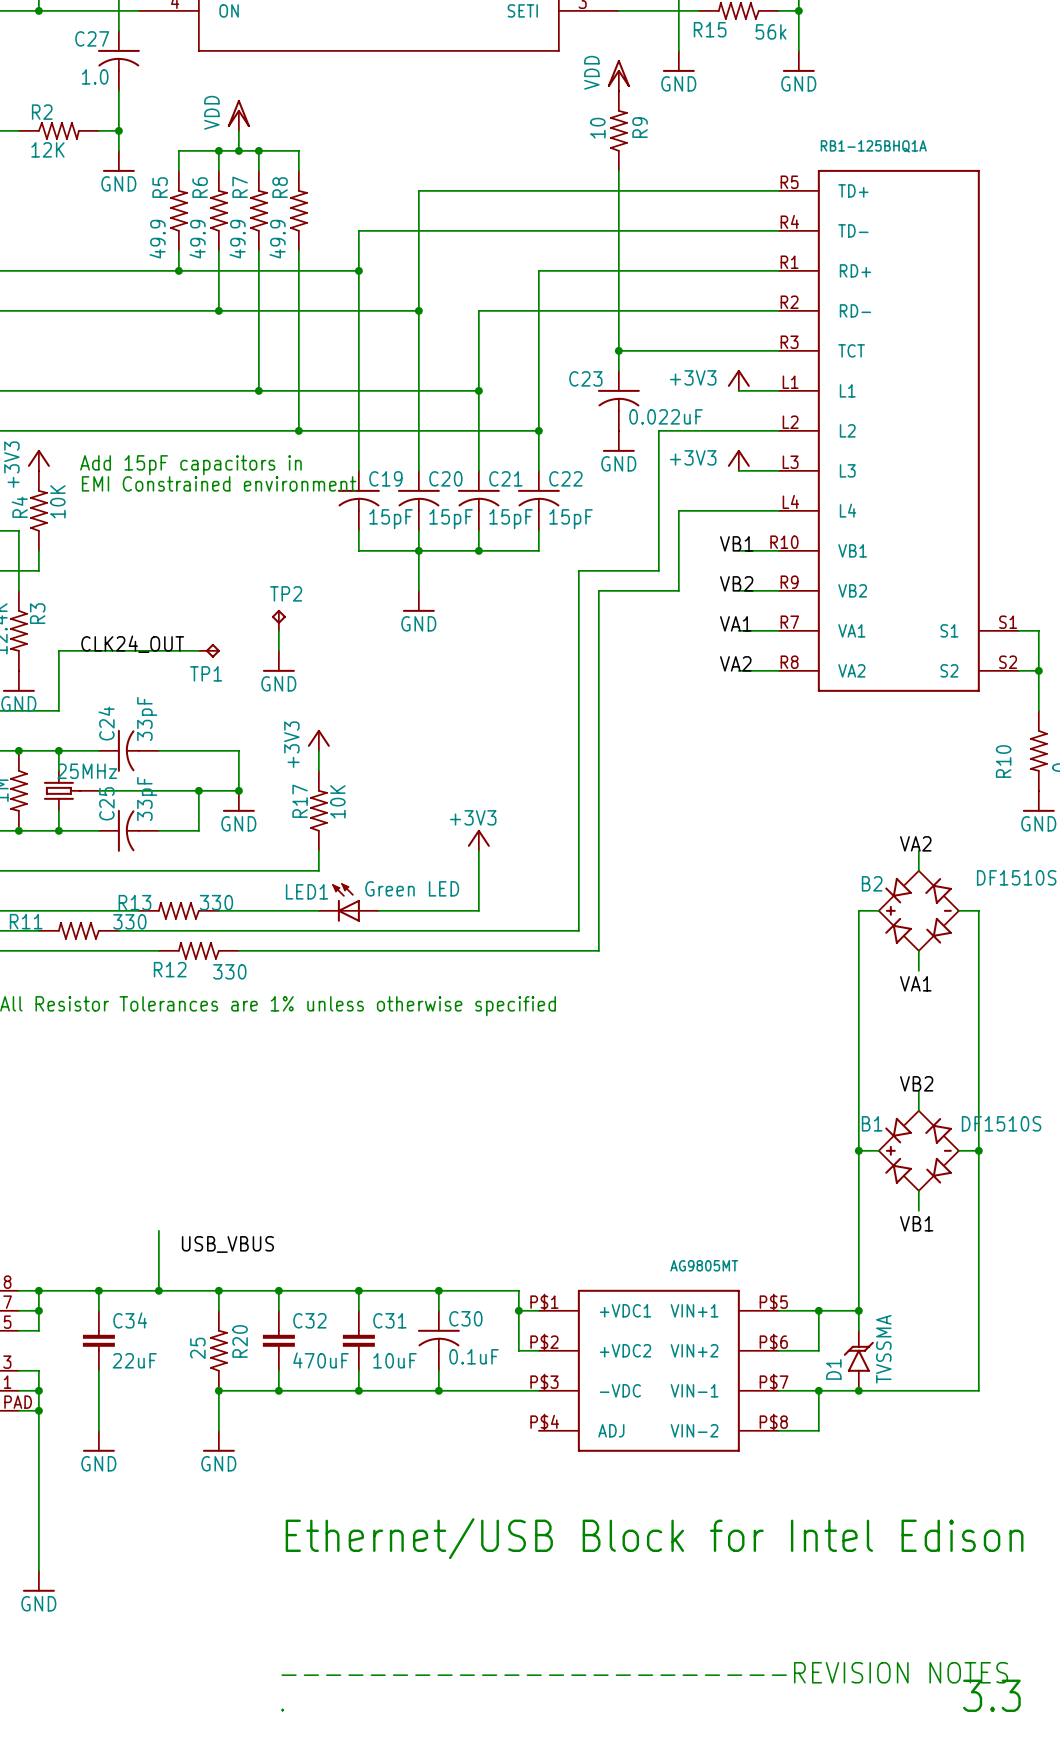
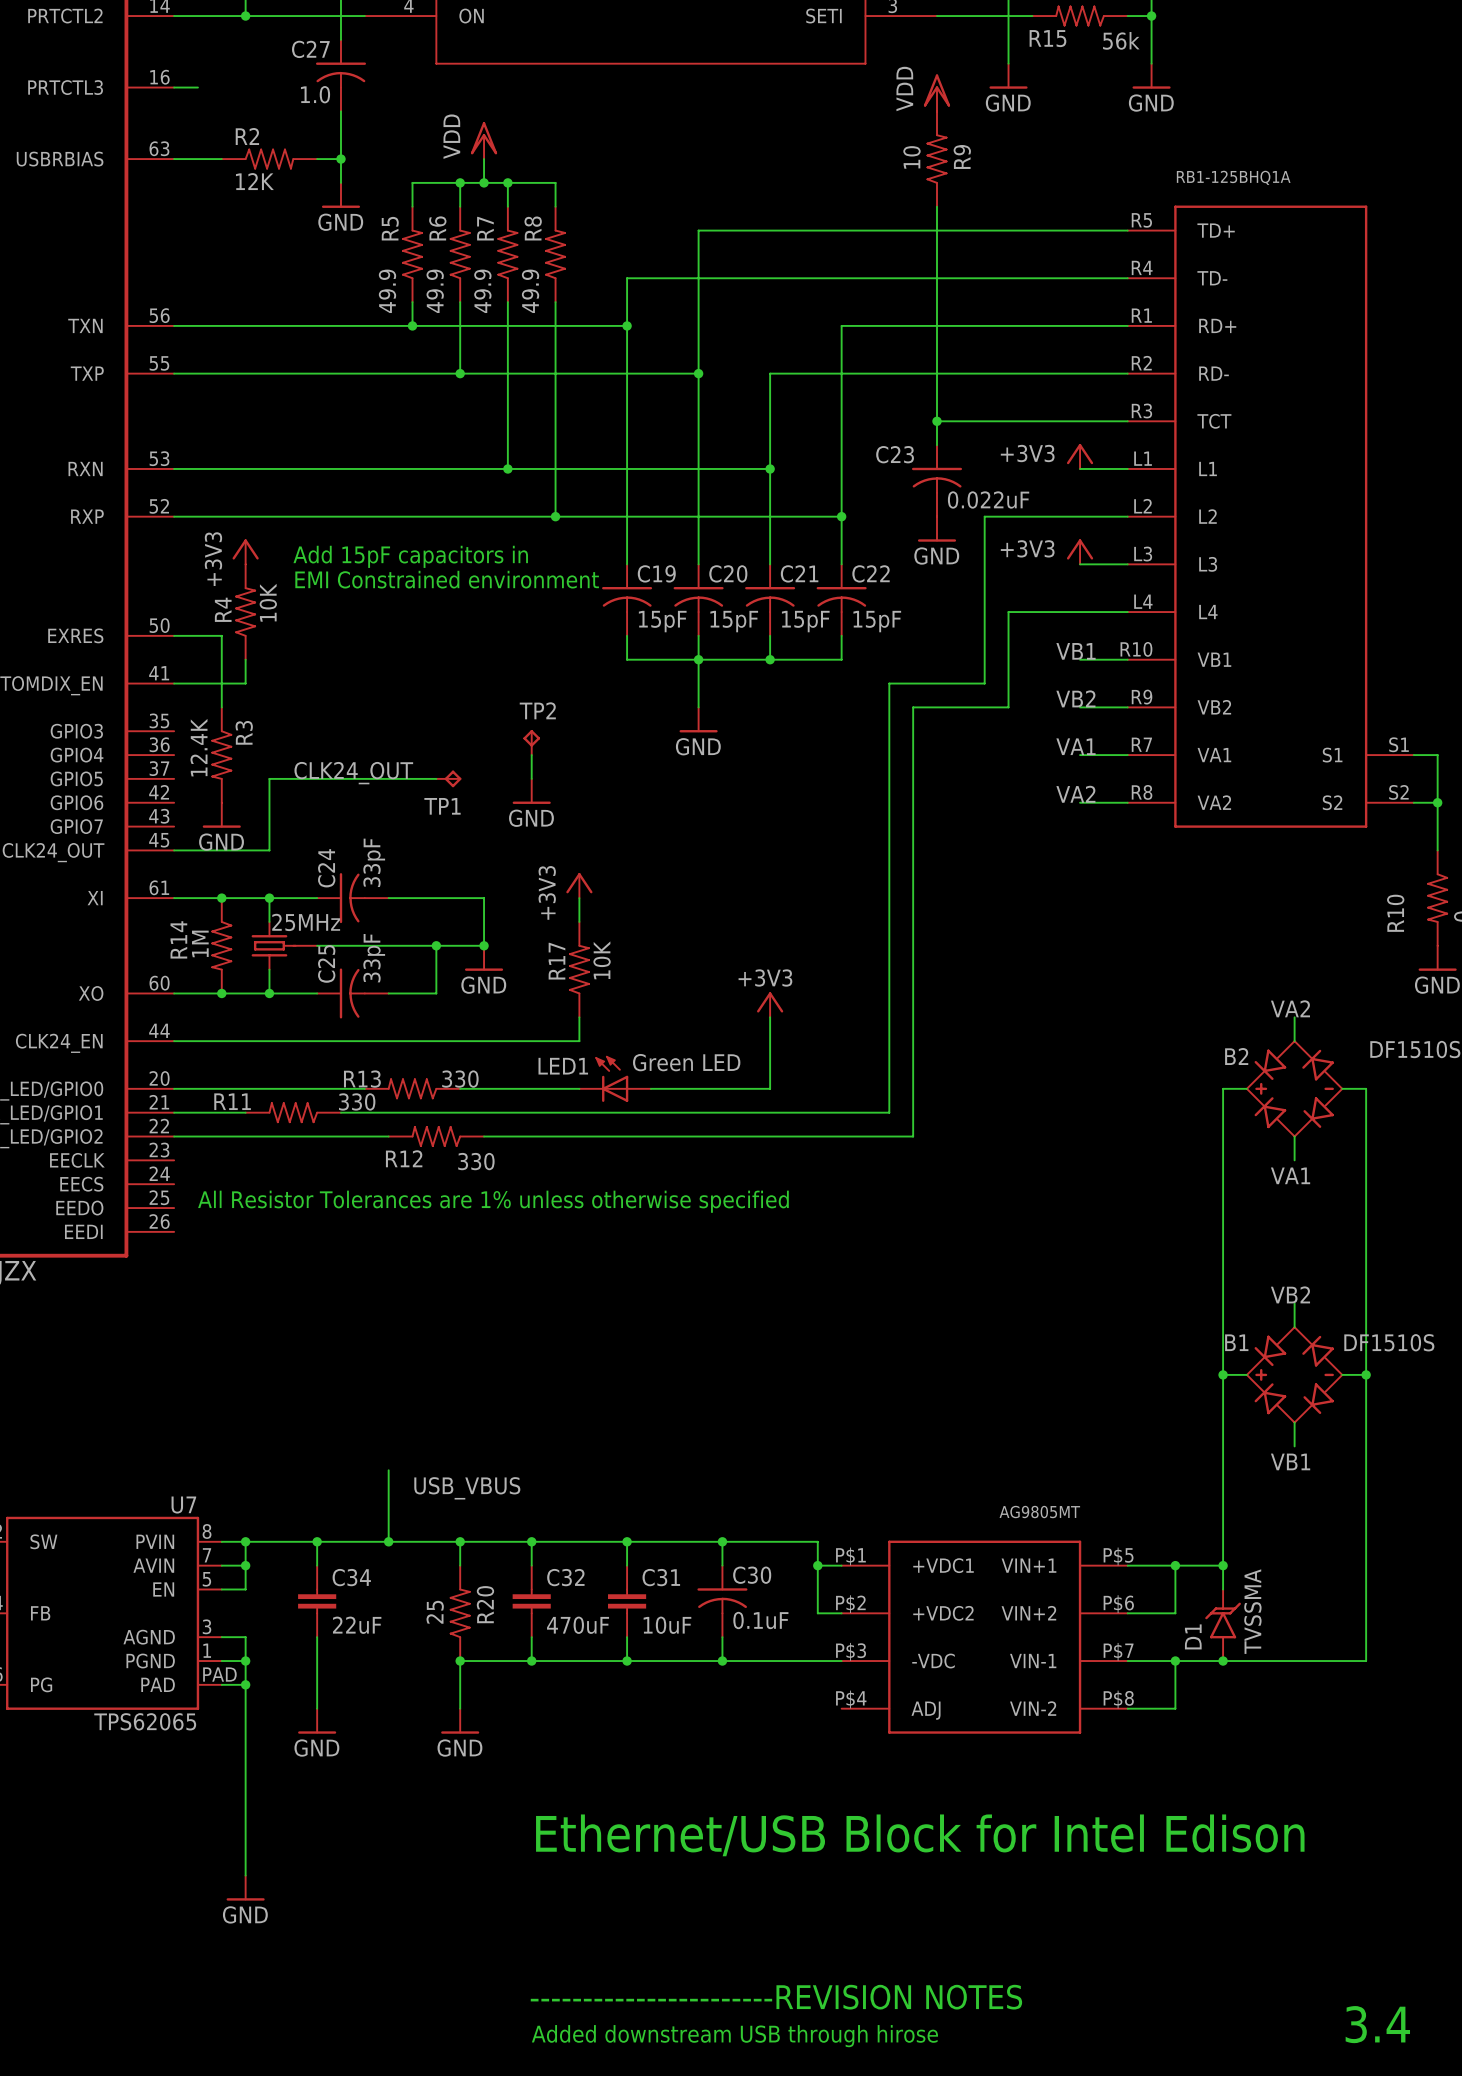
text: 3.3 (991, 1695) -> 3.4 (1377, 2024)
text: . (282, 1710) -> Added downstream USB through hirose (734, 2036)

